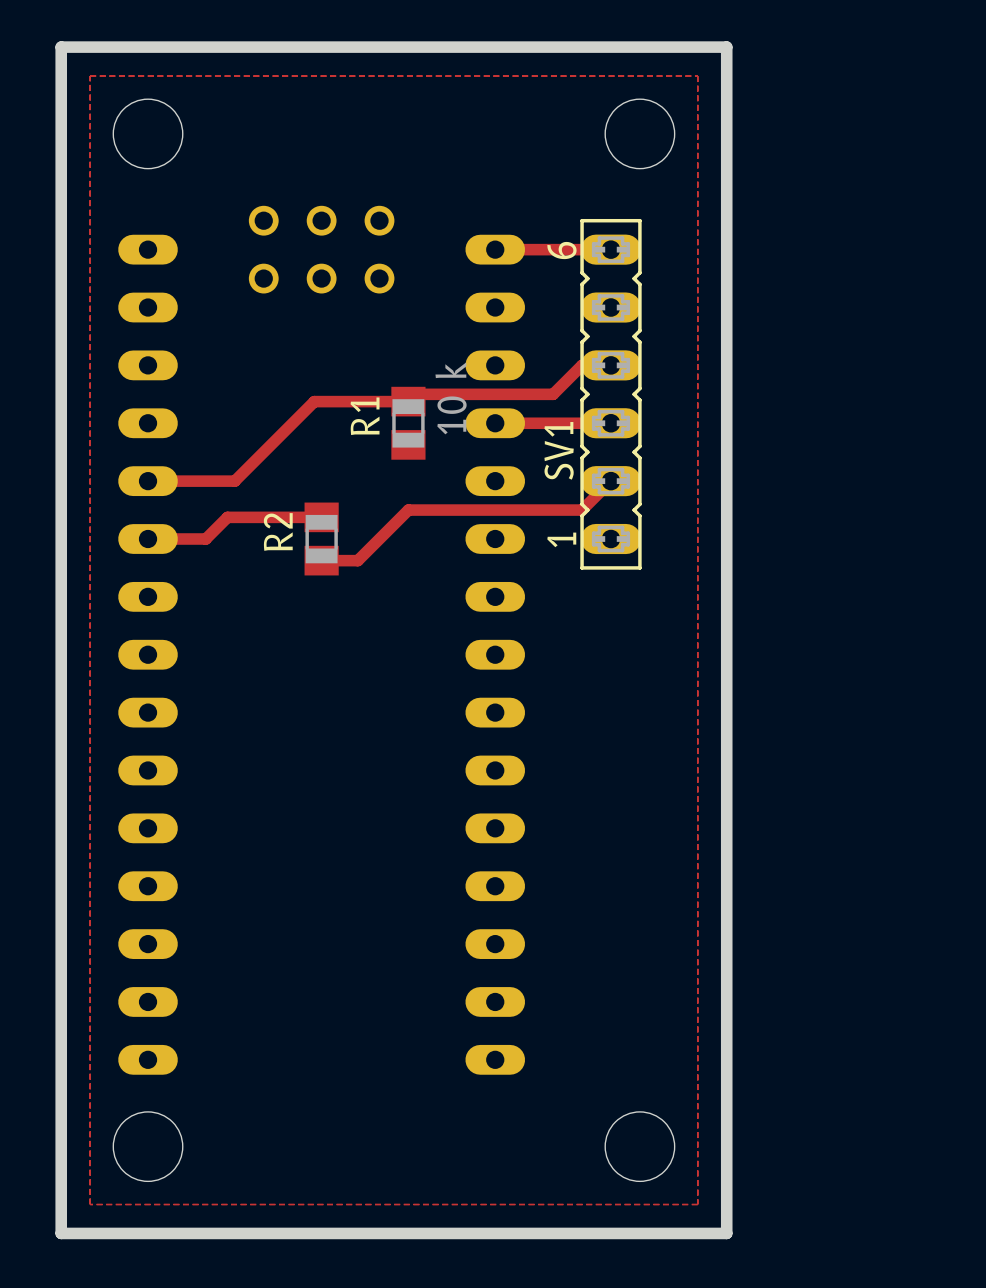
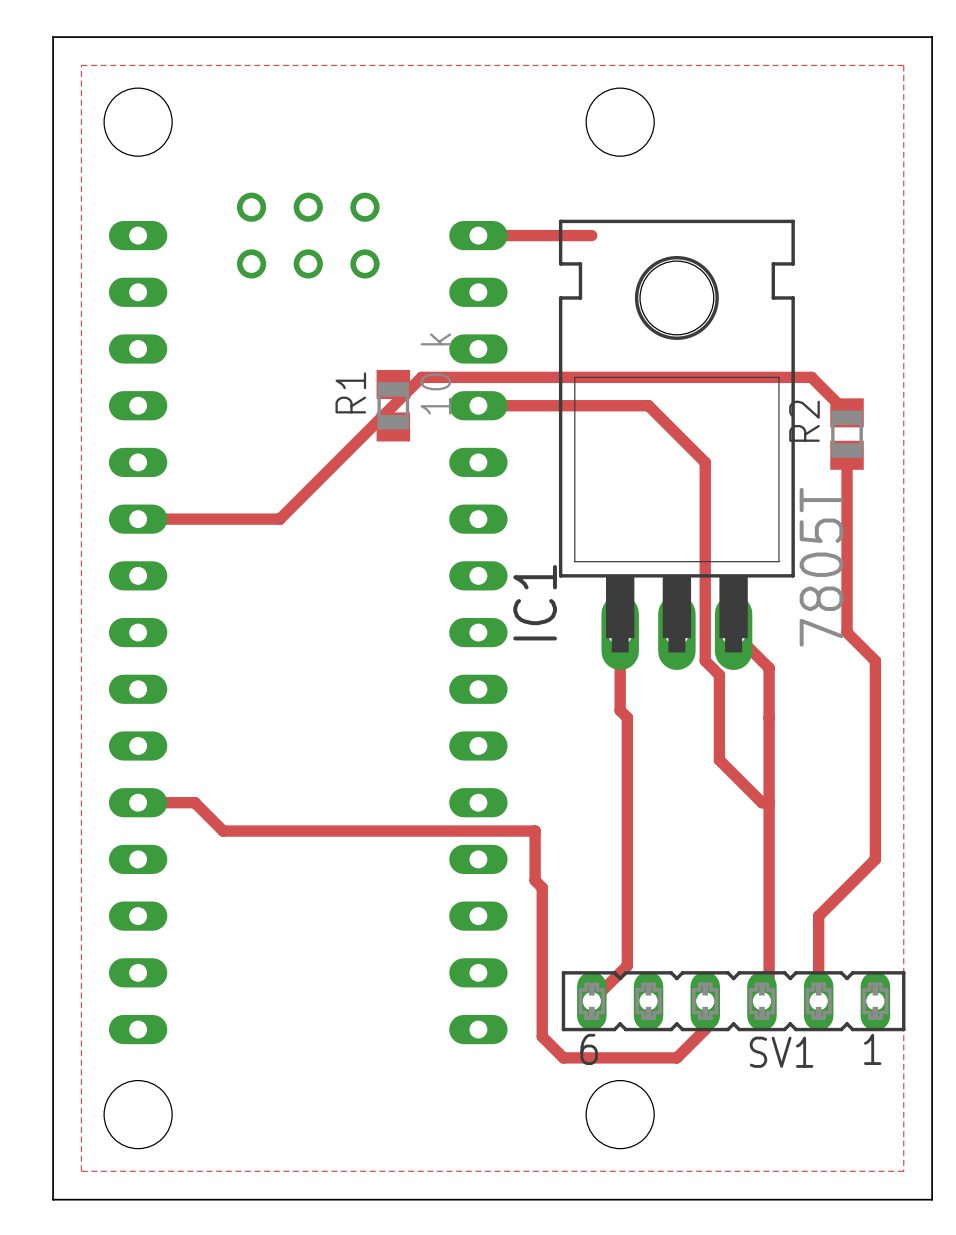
board edge: (726, 47) (726, 1233) -> (705, 37) (932, 37) (932, 1199) (705, 1199)
board edge width: thick (726, 47) (61, 47) (61, 1233) (726, 1233) -> thin (705, 37) (53, 37) (53, 1199) (705, 1199)
top zone outline: (697, 76) (697, 1204) -> (676, 65) (903, 65) (903, 1171) (676, 1171)
SV1 footprint: [580, 218, 642, 570] -> [561, 971, 906, 1032]
top track: (610, 365) (582, 365) (553, 394) -> (847, 412) (811, 377) (535, 377)
top track: (437, 394) (415, 394) (408, 401) (314, 401) (234, 481) (148, 481) -> (421, 377) (279, 519) (194, 519)
top track: none -> (591, 405) (648, 405) (705, 462) (705, 660) (719, 675) (719, 760) (761, 802) (769, 802)
SV1 name position: SV1 (559, 450) -> SV1 (781, 1052)
IC1: none -> 7805T (676, 444)
top track: none -> (847, 455) (847, 632) (875, 660) (875, 859) (818, 916) (818, 1001)
top track: (610, 481) (582, 510) (408, 510) (357, 560) (321, 560) (321, 567) -> none
top track: (321, 517) (227, 517) (205, 539) -> none
R2 position: (321, 539) -> (847, 434)
top track: none -> (620, 632) (620, 710) (627, 717) (627, 965) (591, 1001)
top track: none -> (733, 632) (769, 668) (769, 994) (761, 1001)
top track: none -> (138, 802) (194, 802) (223, 831) (535, 831) (535, 880) (542, 887) (542, 1036) (563, 1057) (676, 1057) (705, 1029) (705, 1001)

